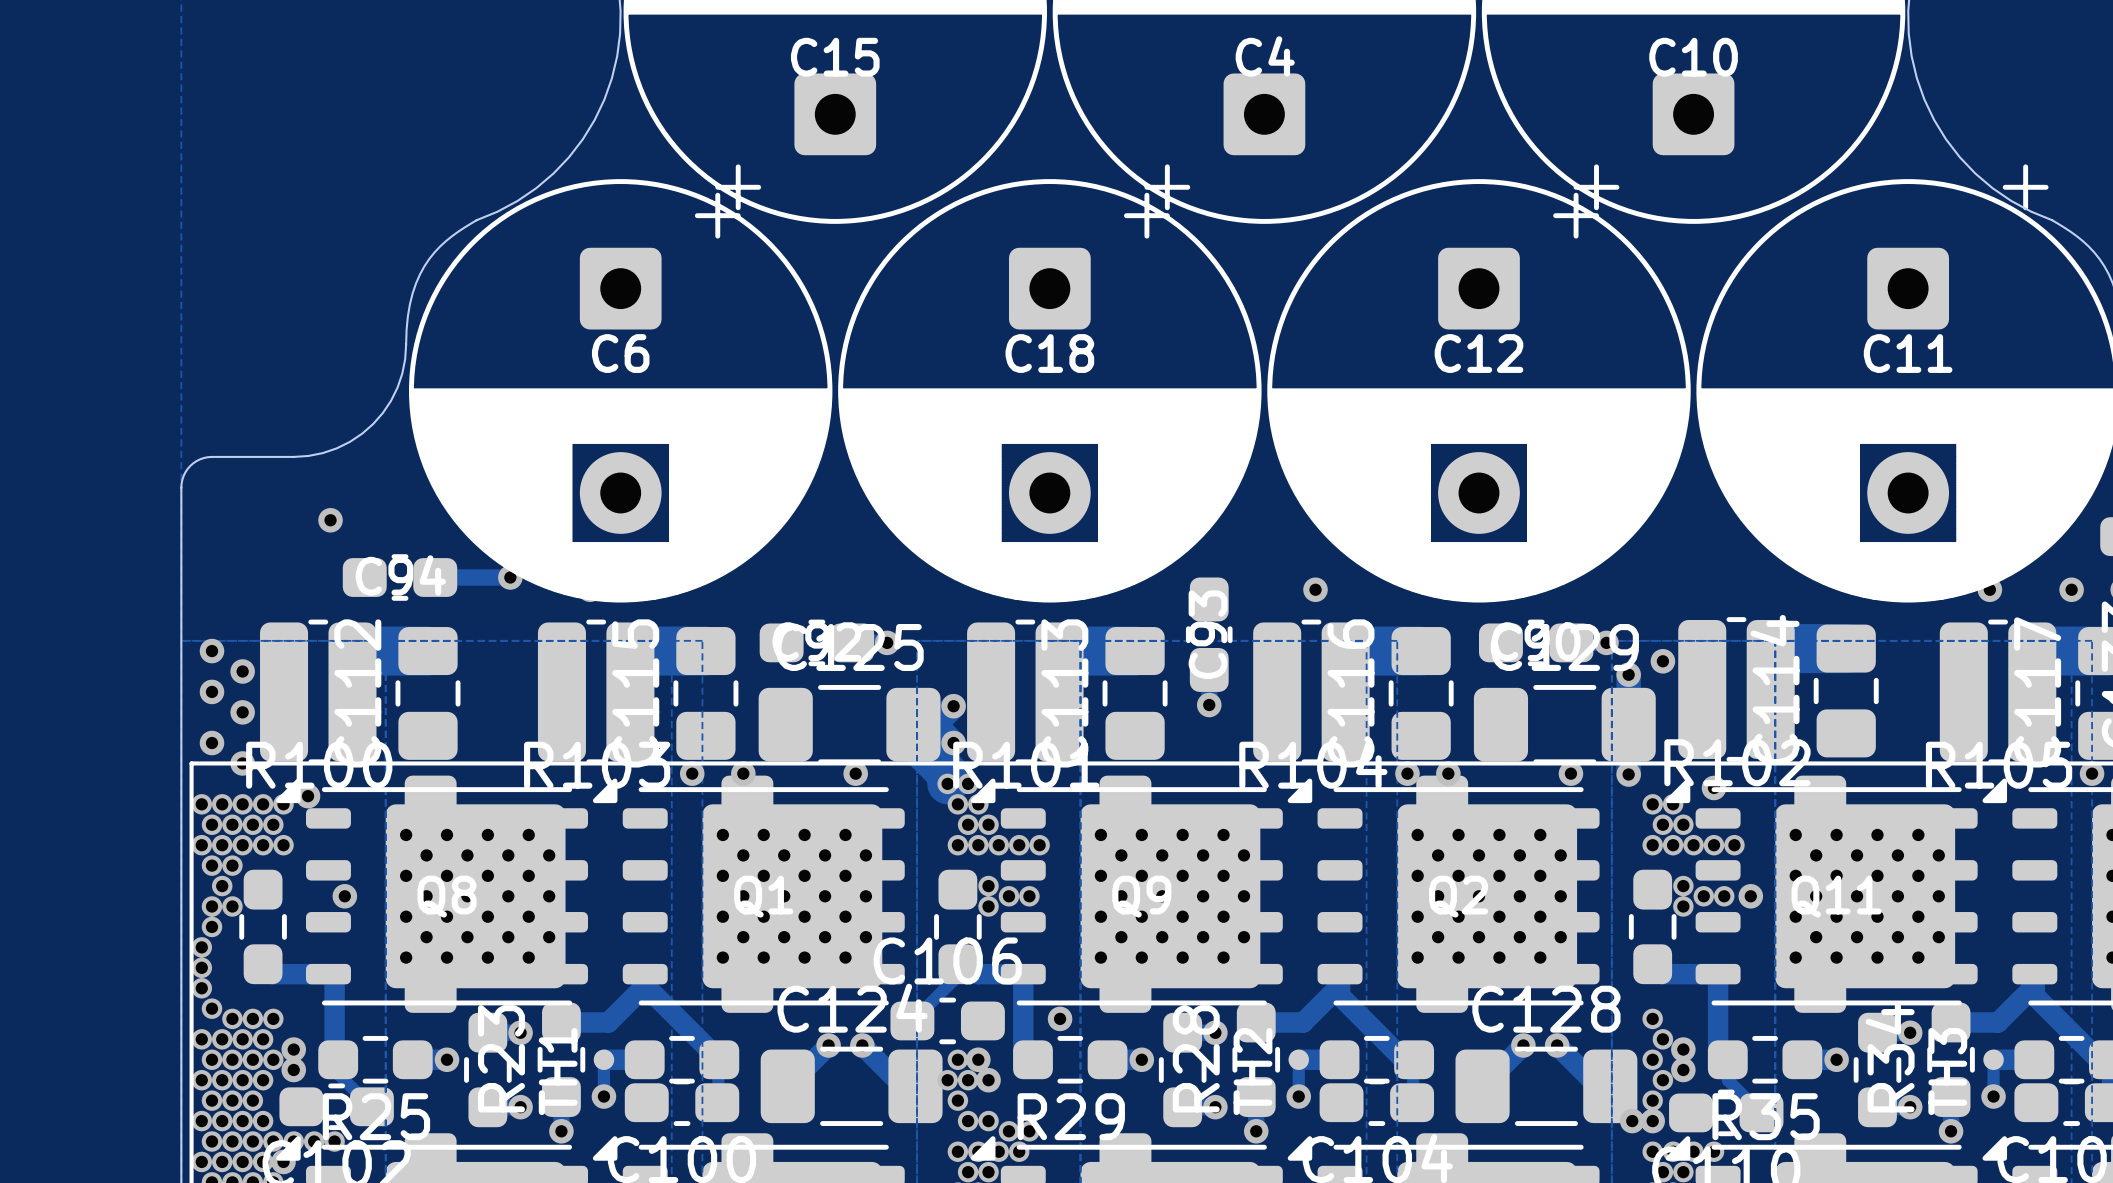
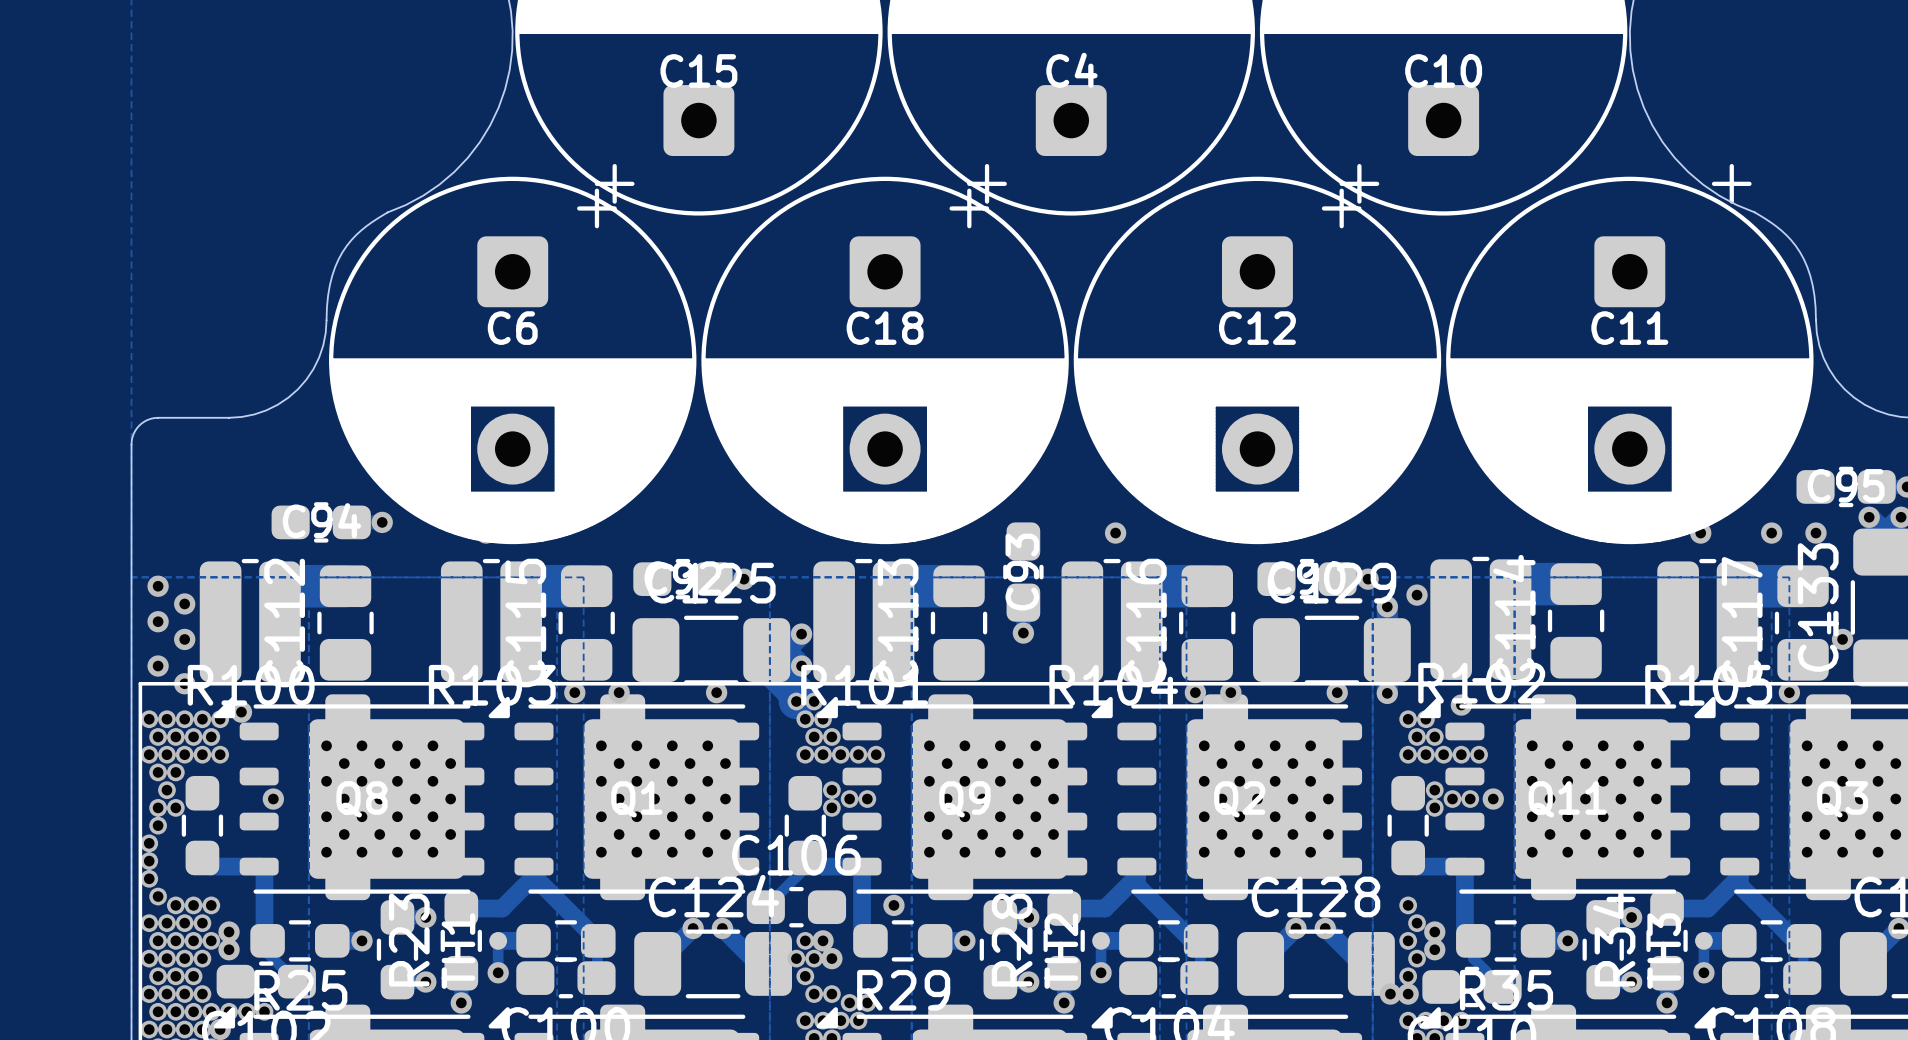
via: (330, 520) -> none
track: (470, 577) (510, 577) -> none
via position: (510, 577) -> (382, 522)

